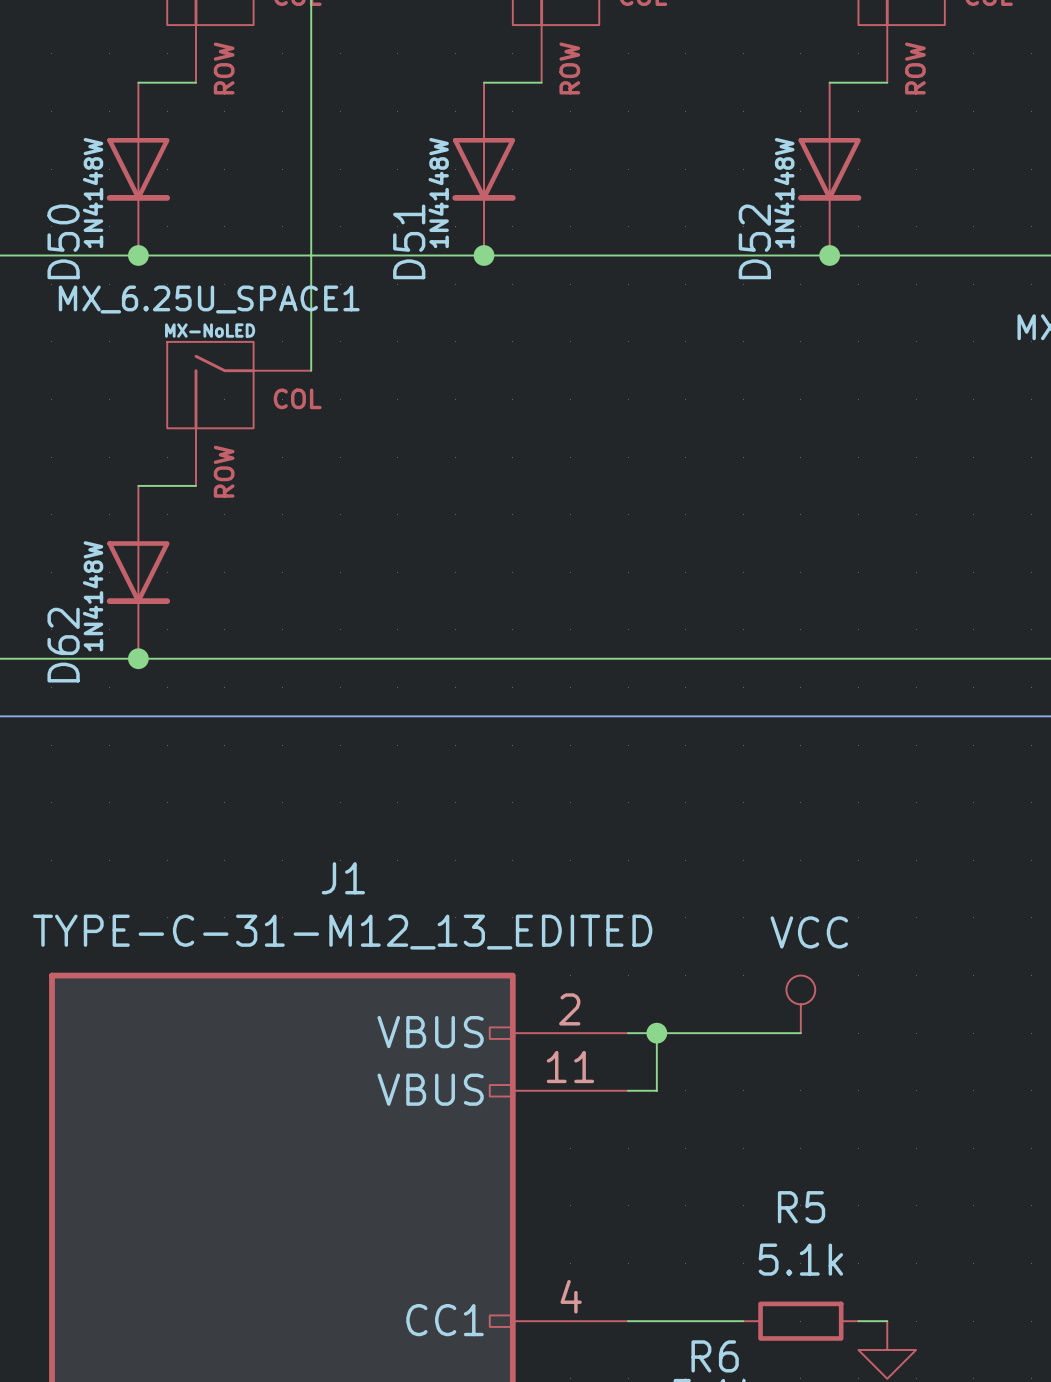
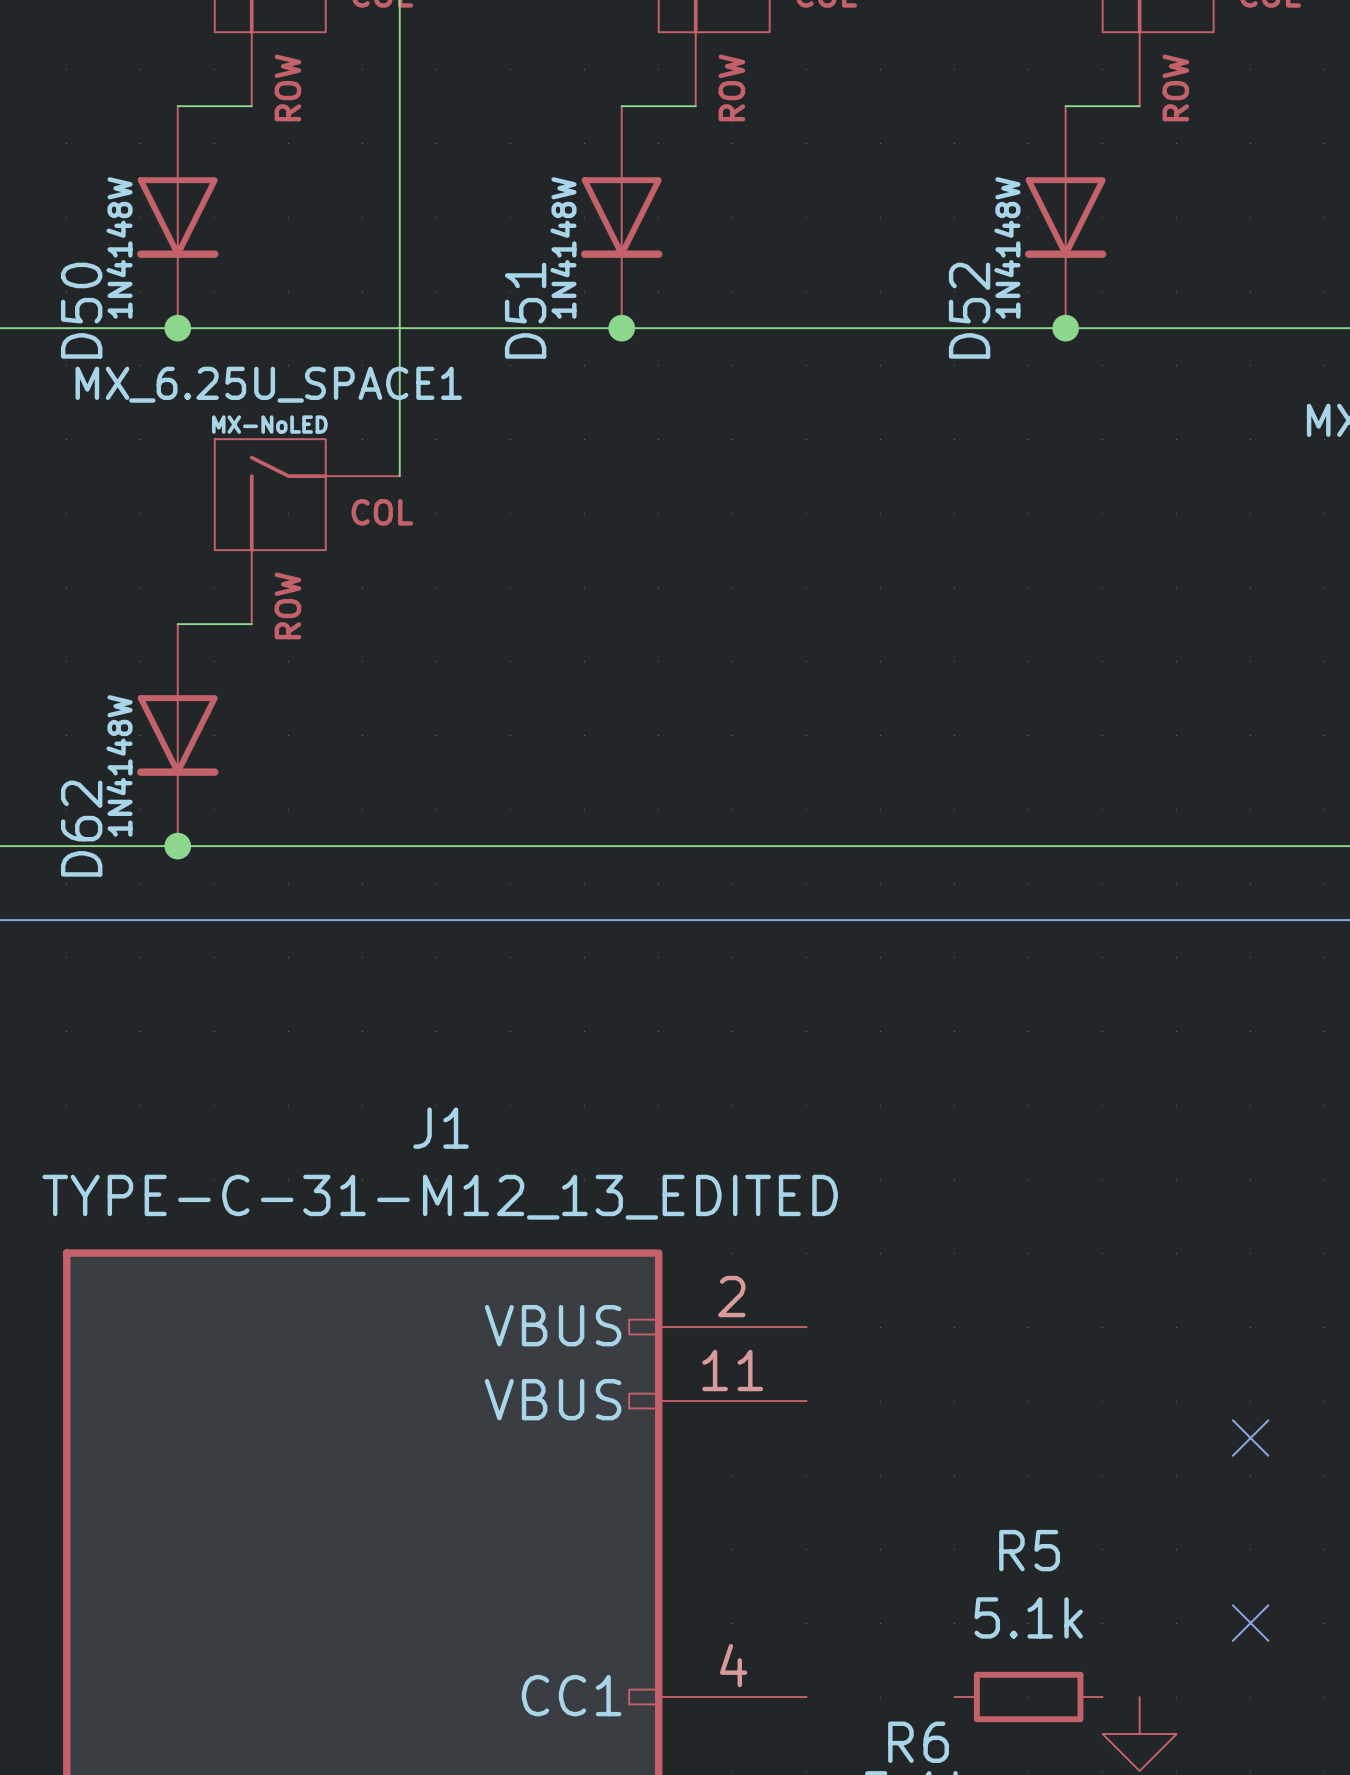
power symbol: VCC (800, 1004) -> none
wire: (628, 1033) (800, 1033) -> none
wire: (656, 1033) (656, 1090) (628, 1090) -> none
junction: (656, 1033) -> none
no-connect mark: none -> (1250, 1438)
no-connect mark: none -> (1250, 1623)
wire: (628, 1321) (743, 1321) -> none
wire: (858, 1321) (887, 1321) -> none

